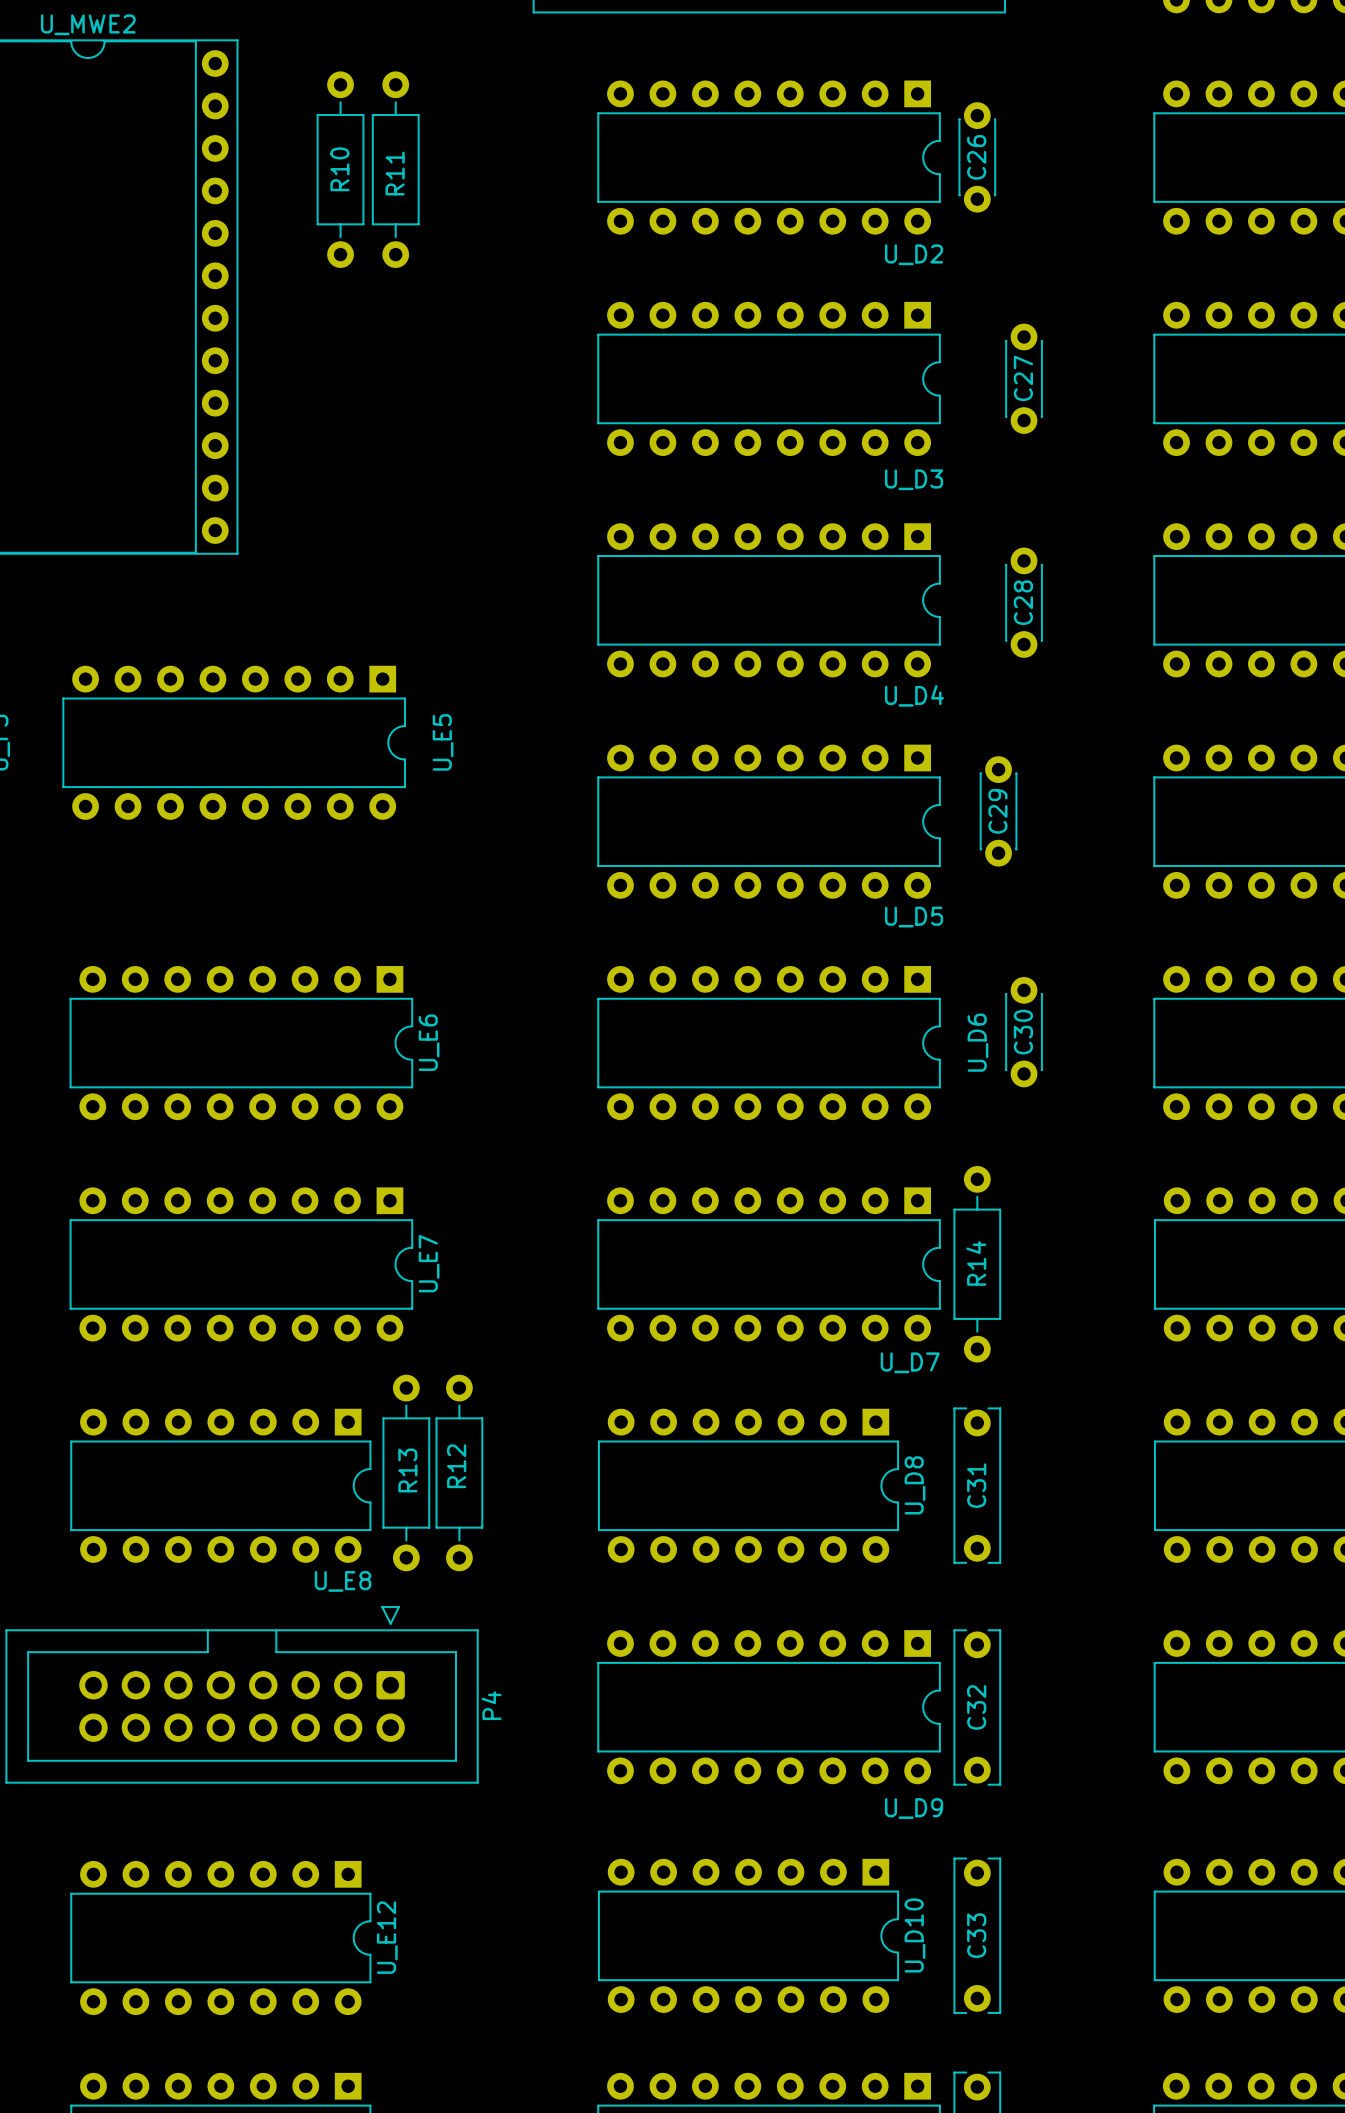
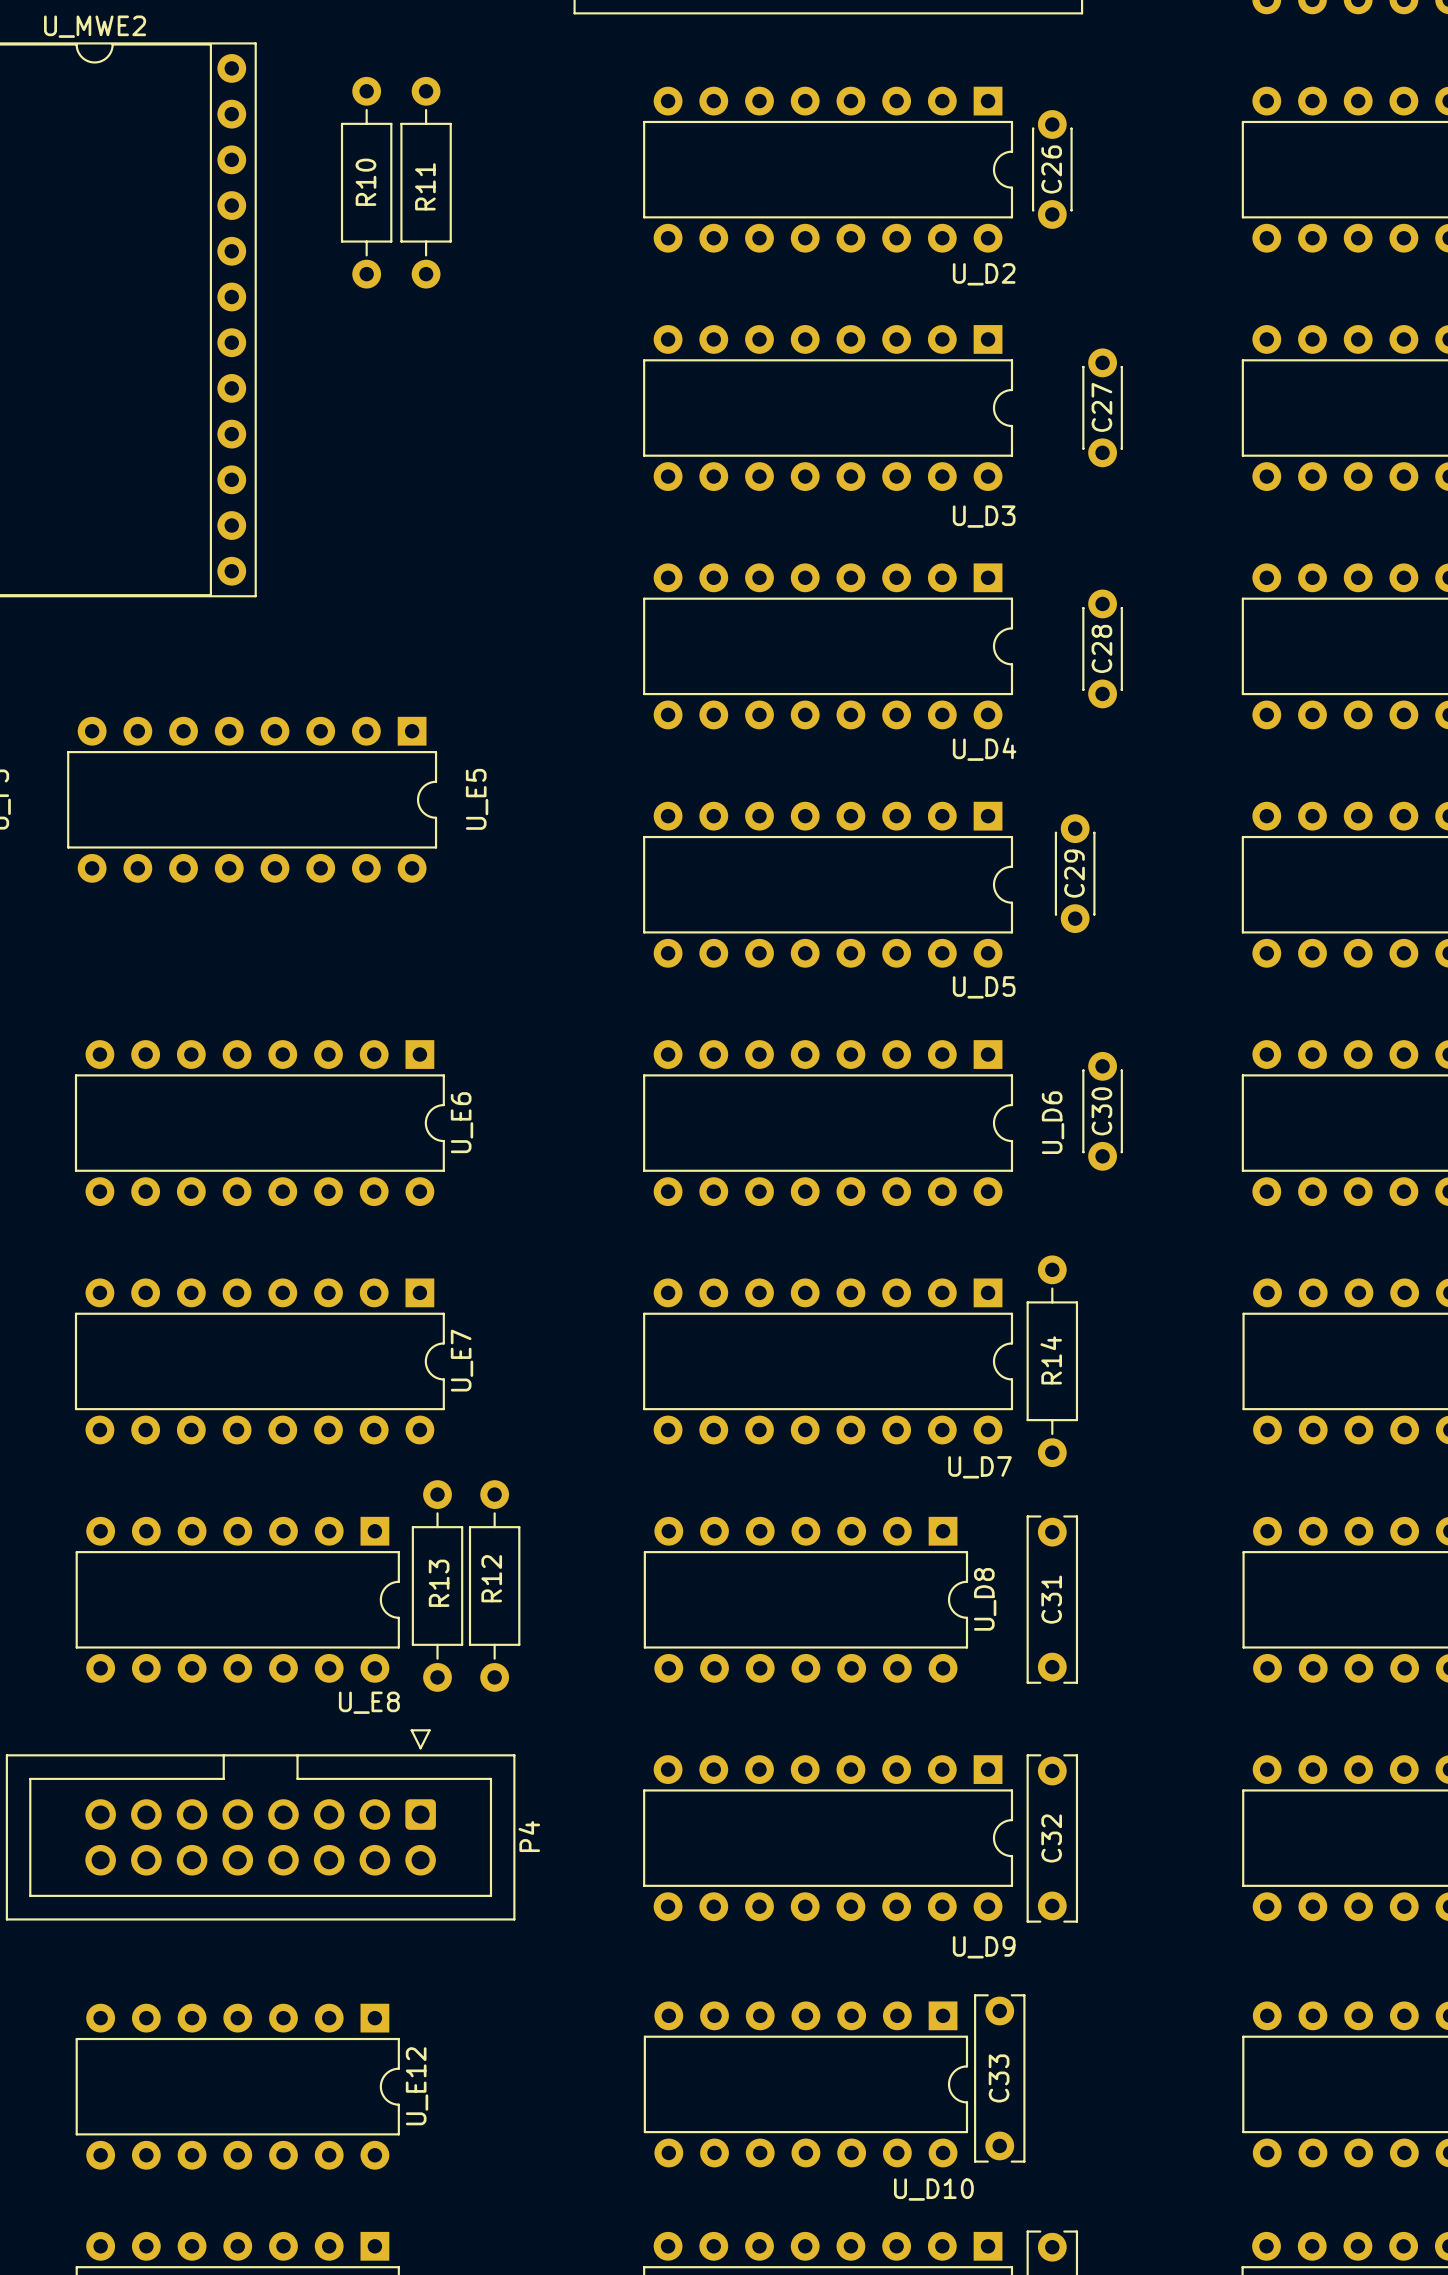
U_D10 name rotation: 0° (914, 1935) -> 90° clockwise (933, 2189)
U_D10 name position: U_D10 (914, 1935) -> U_D10 (933, 2189)
C33 position: (977, 1935) -> (999, 2078)

